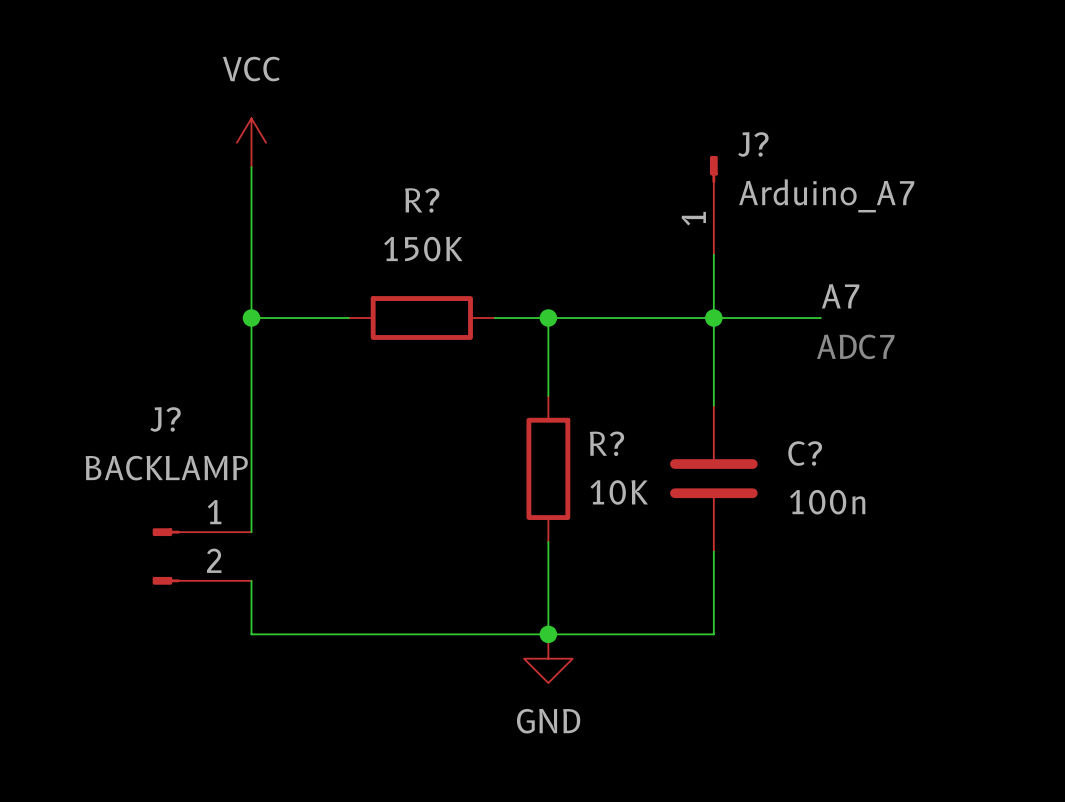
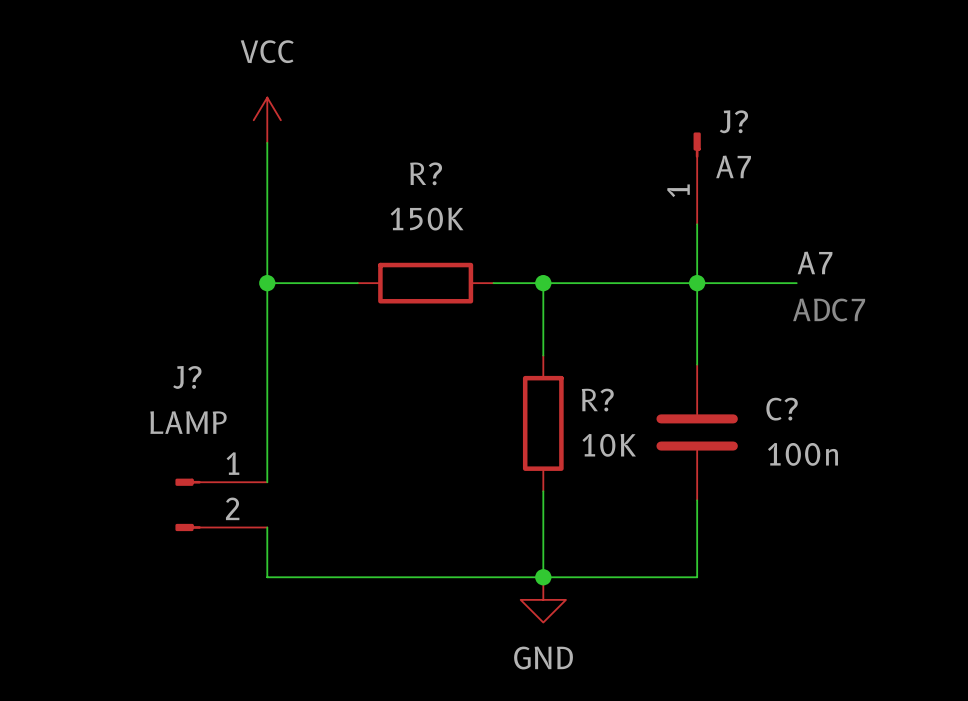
J? value: Arduino_A7 (826, 195) -> A7 (733, 166)
J? value: BACKLAMP (166, 468) -> LAMP (188, 422)

